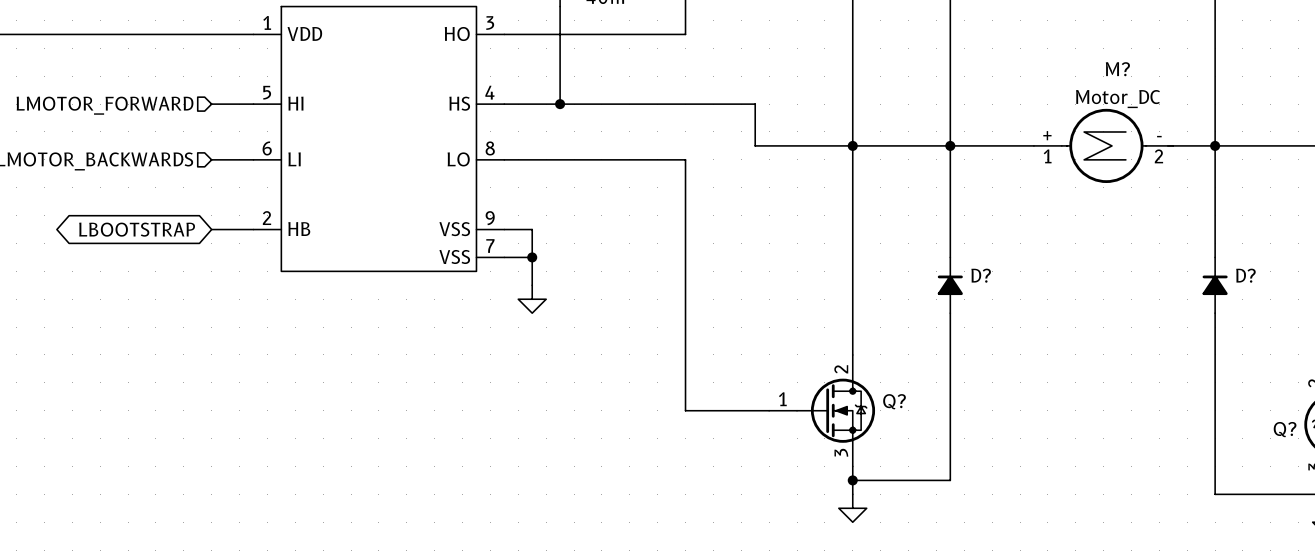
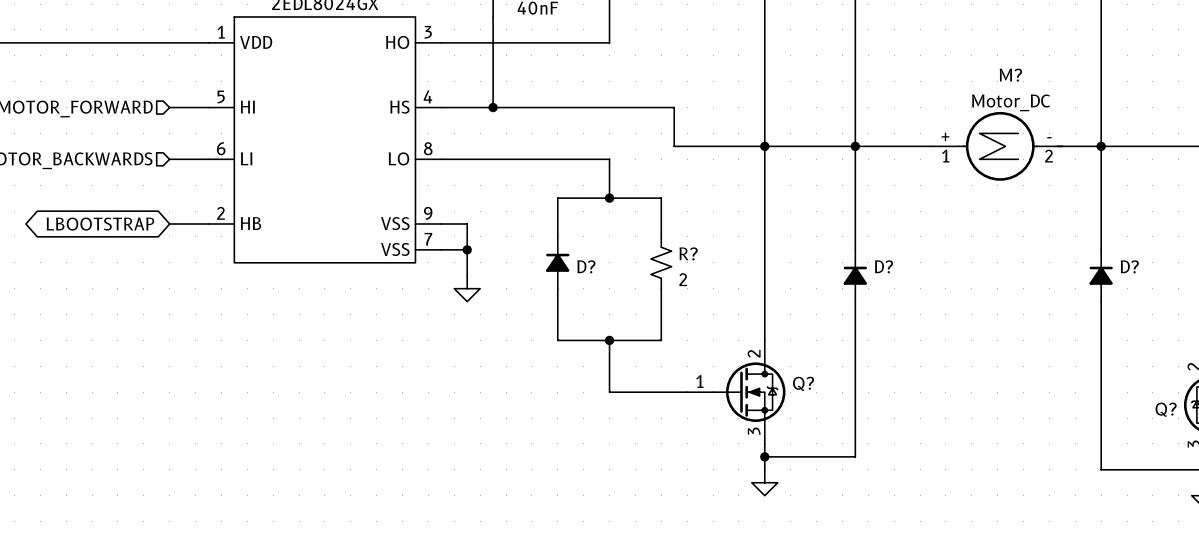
wire: (685, 201) (685, 354) -> none
junction: none -> (609, 198)
wire: none -> (557, 236) (557, 198) (661, 198) (661, 236)
D?: none -> (557, 262)
R?: none -> 2 (661, 262)
wire: none -> (557, 288) (557, 340) (661, 340) (661, 288)
junction: none -> (609, 340)

